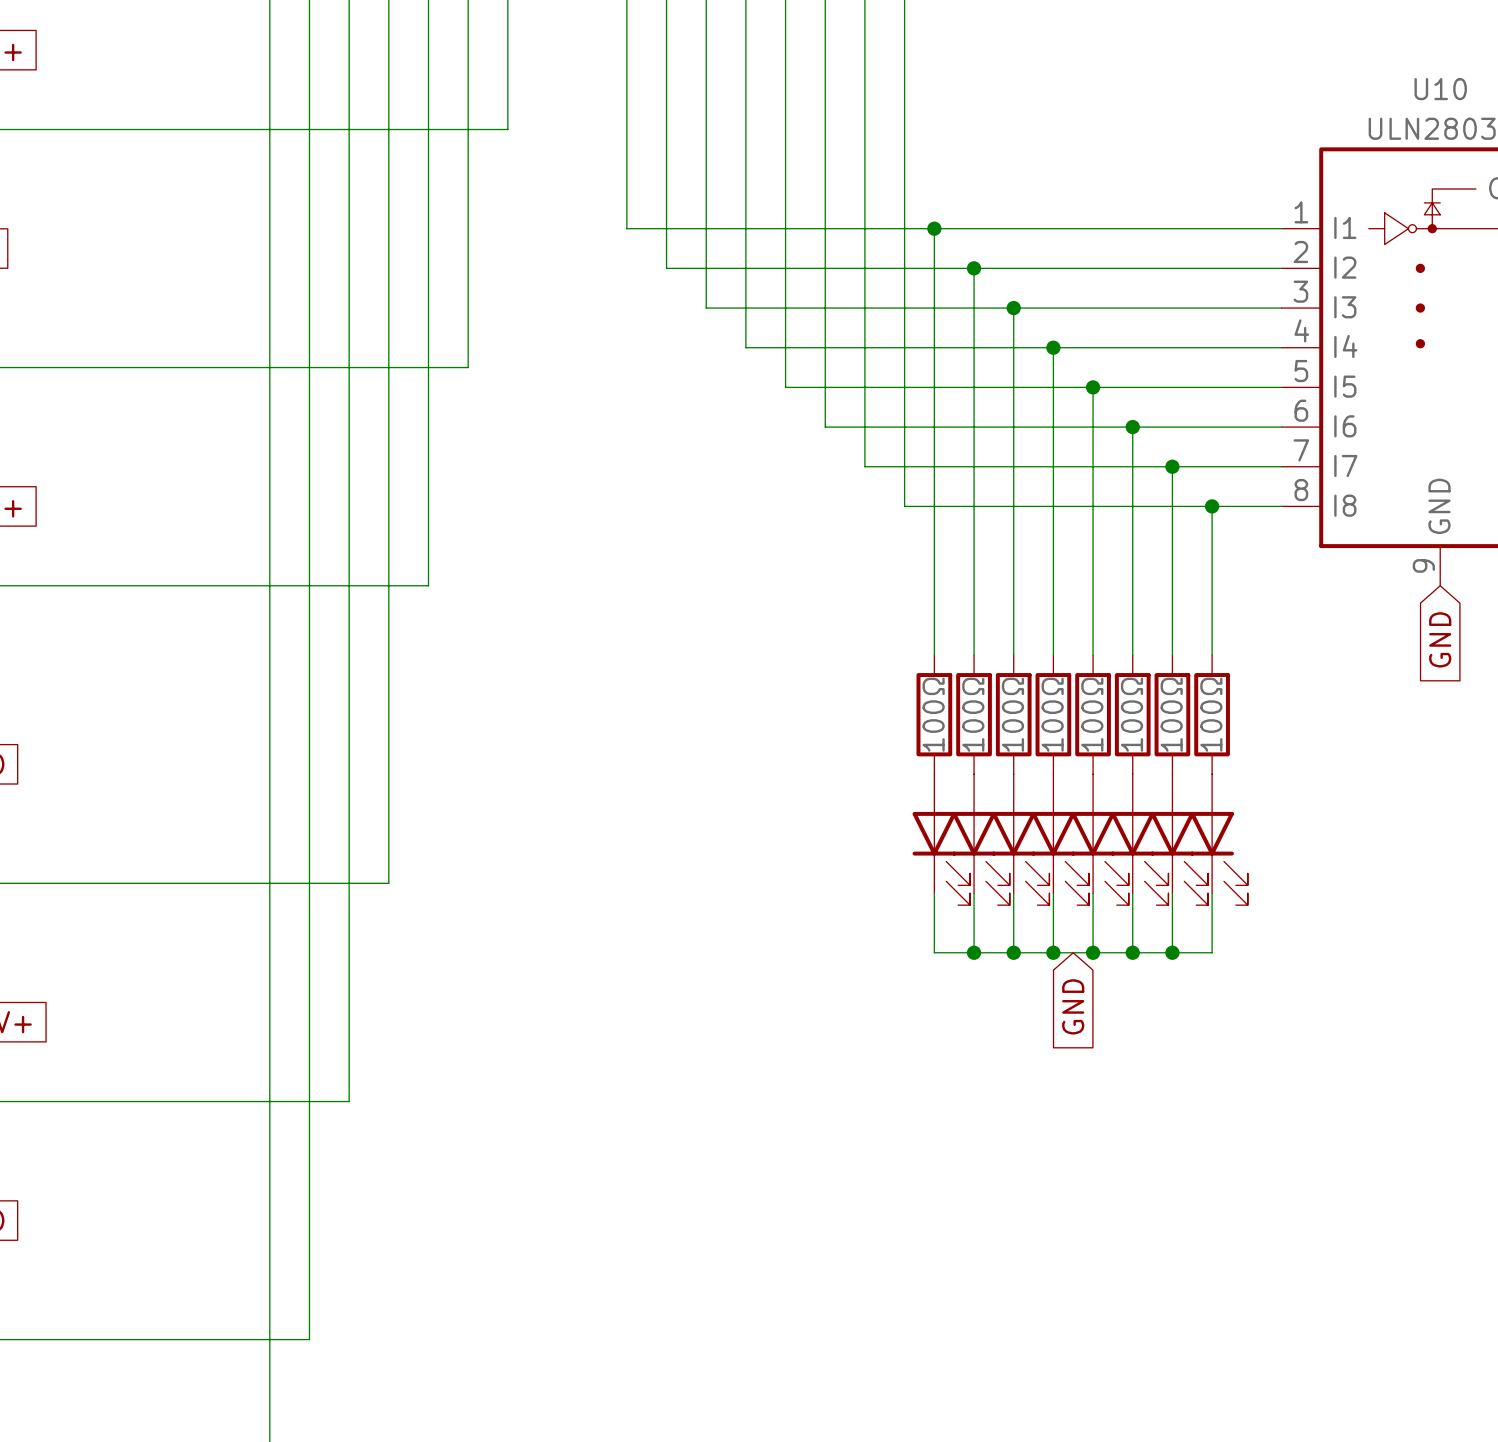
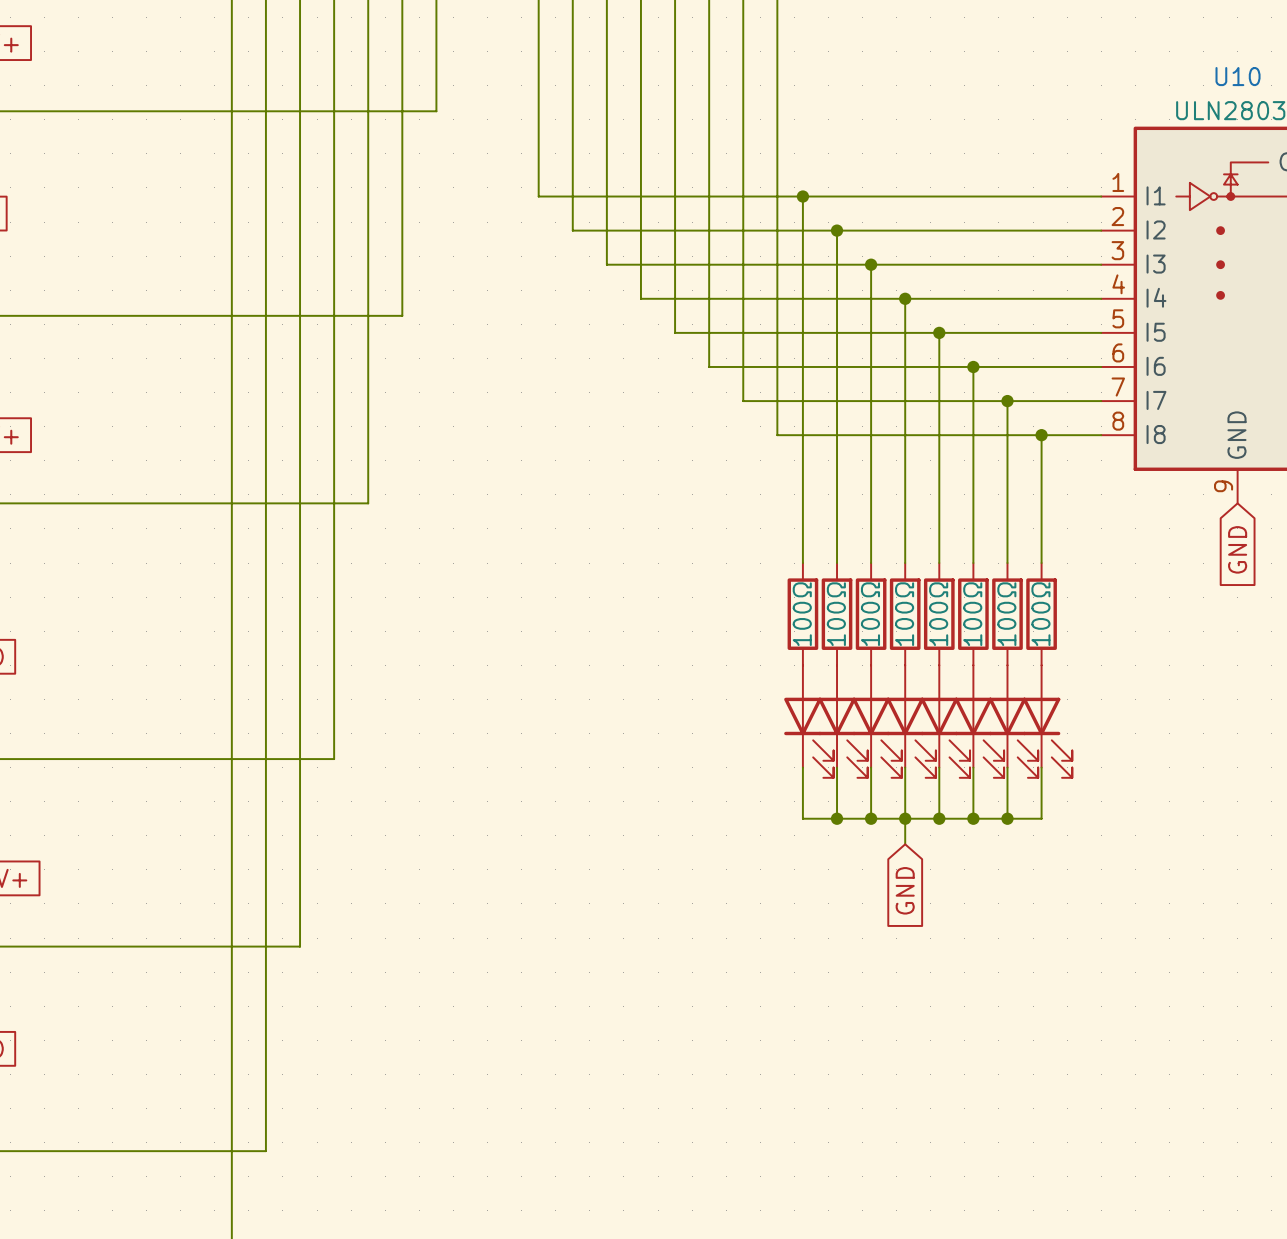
wire: none -> (905, 818) (905, 844)
global label position: GND (1073, 1006) -> GND (905, 890)

